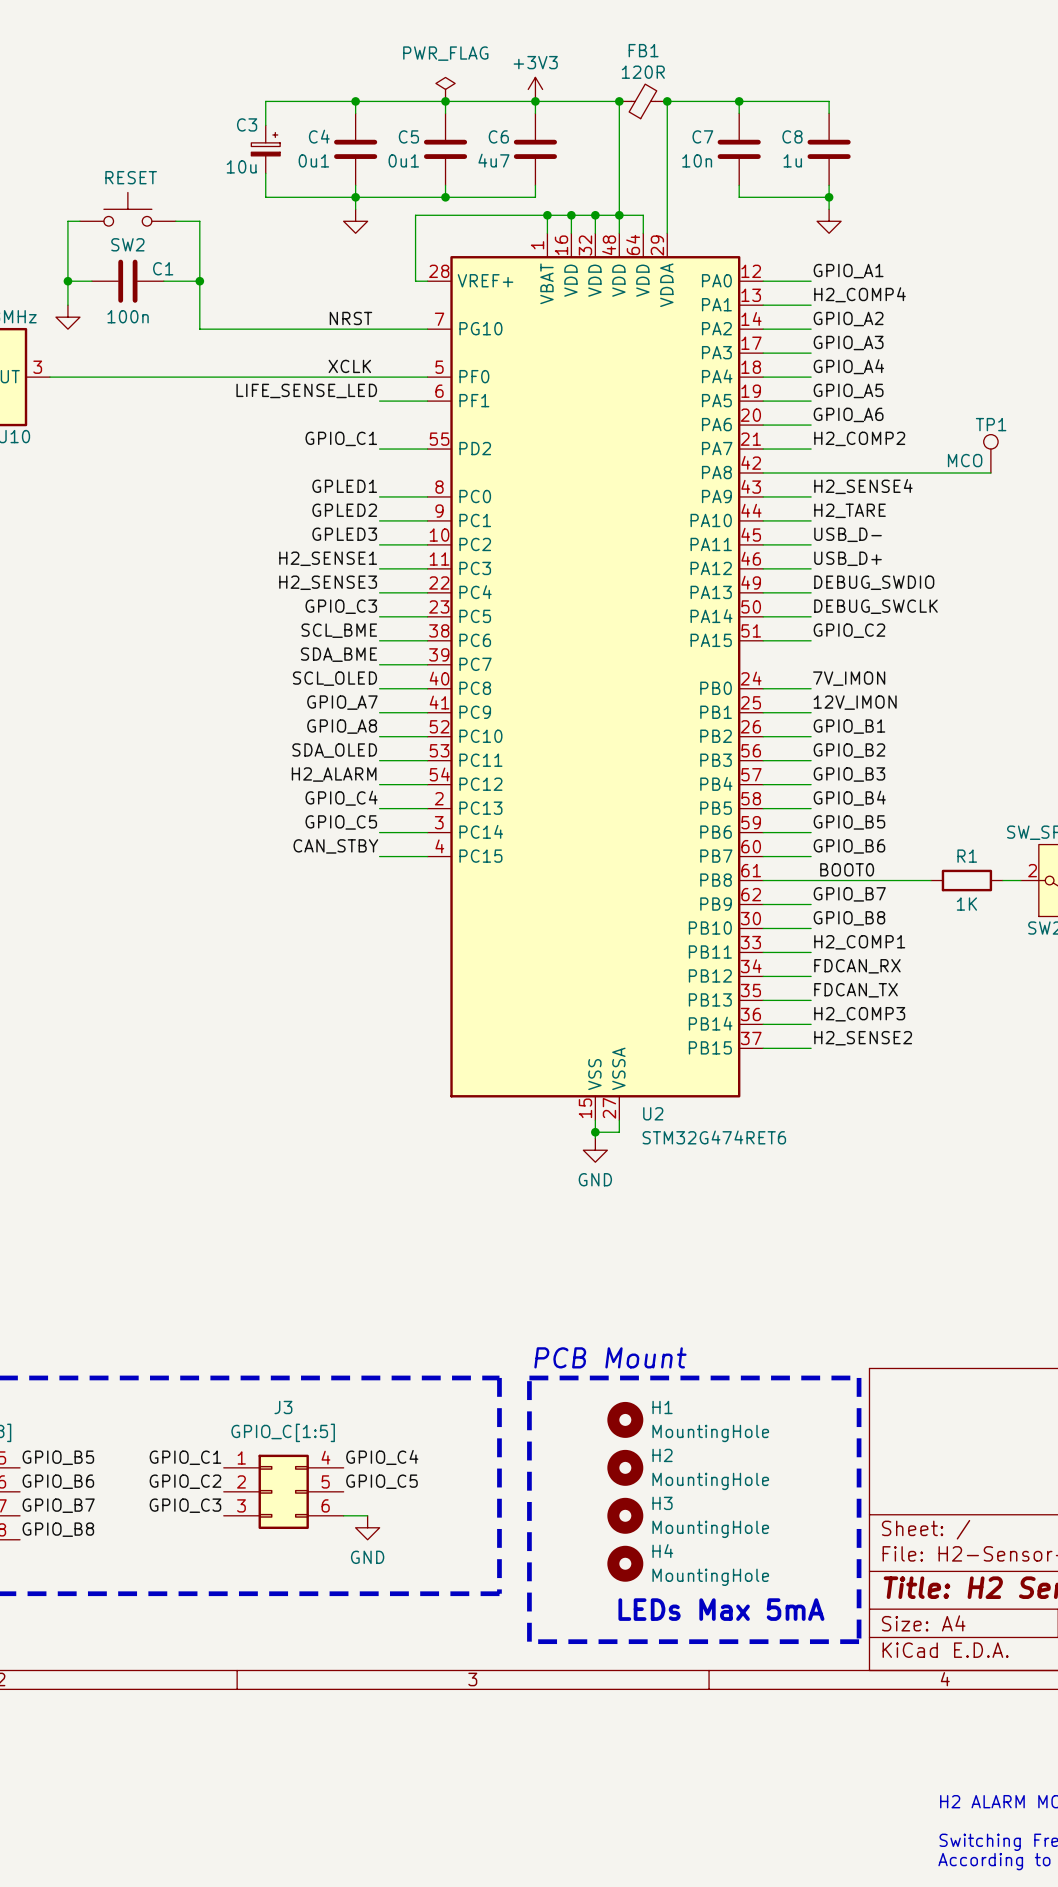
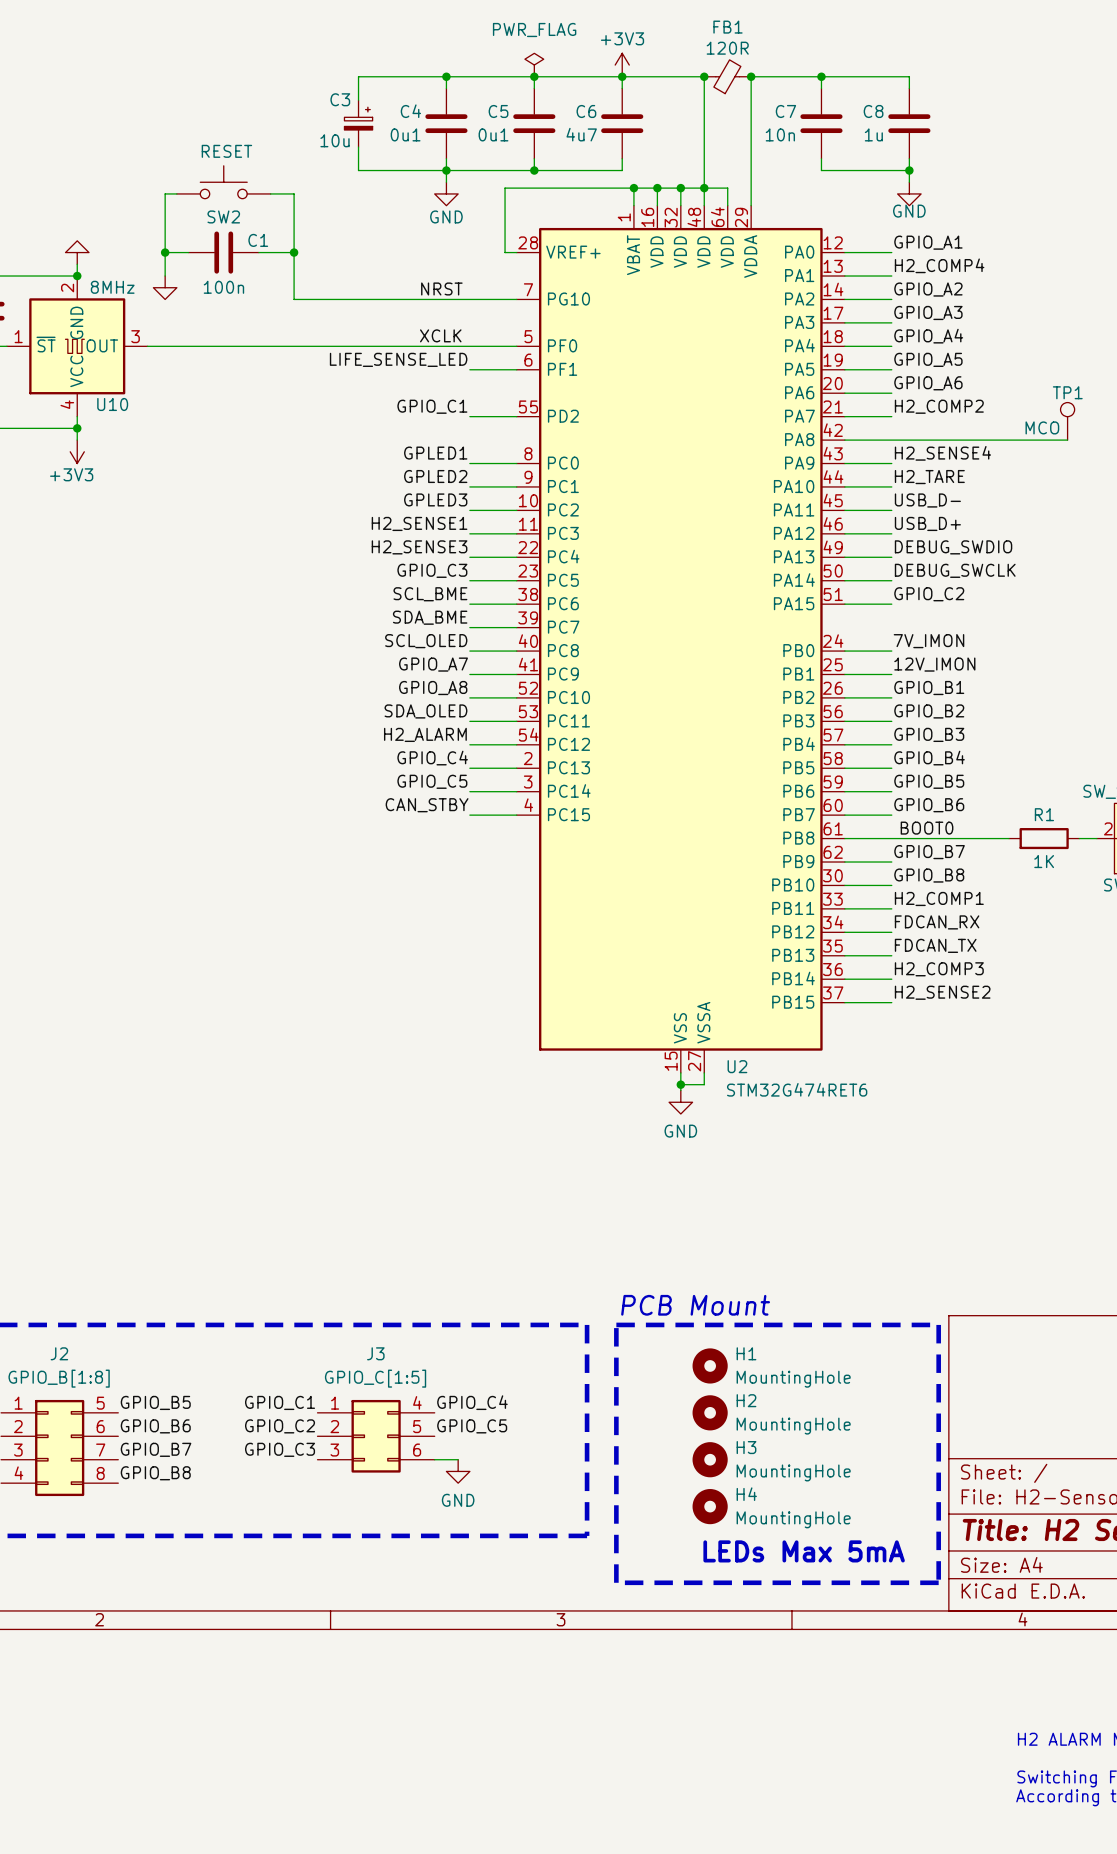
power symbol text: none -> GND (909, 211)
power symbol text: none -> GND (446, 216)

